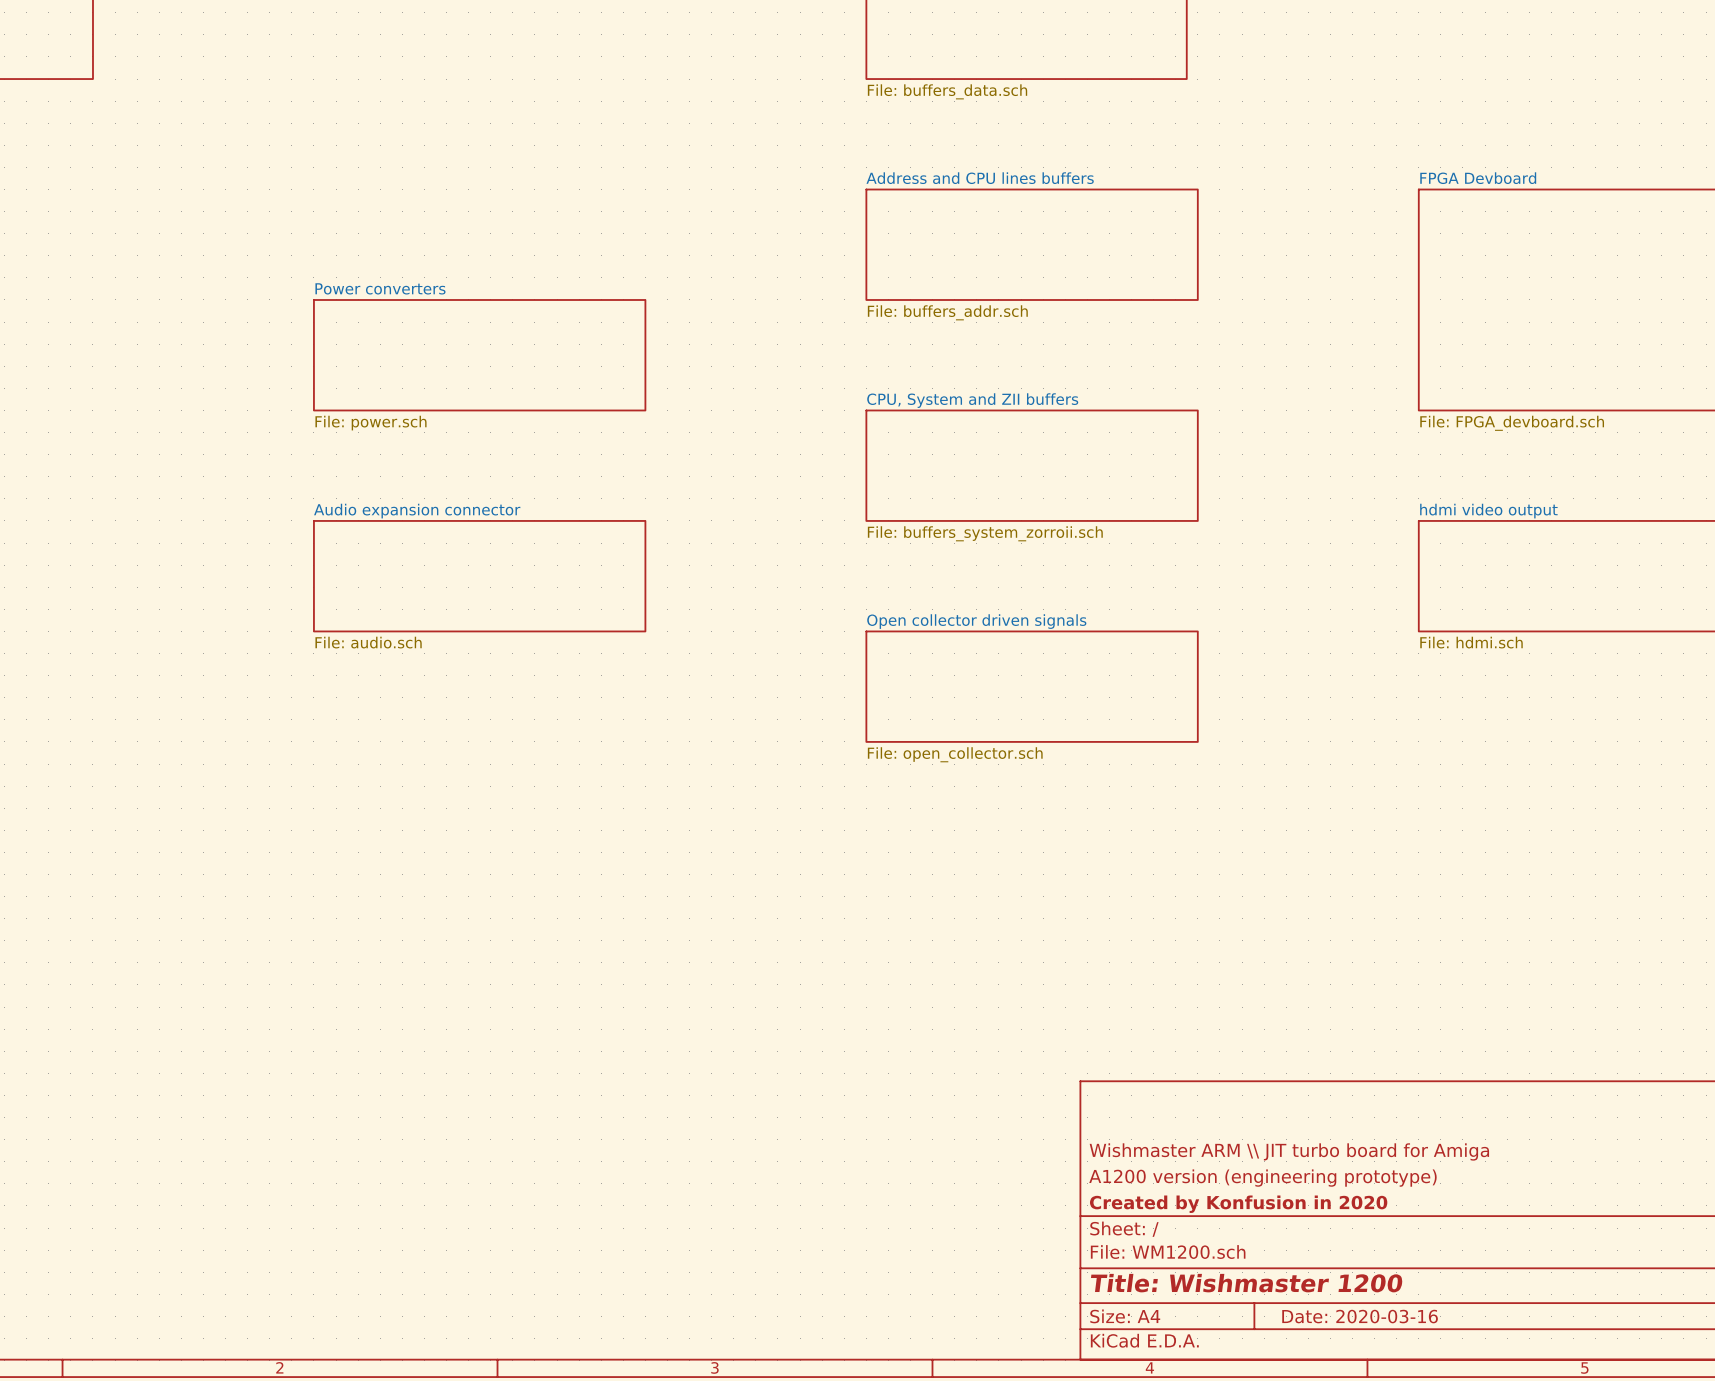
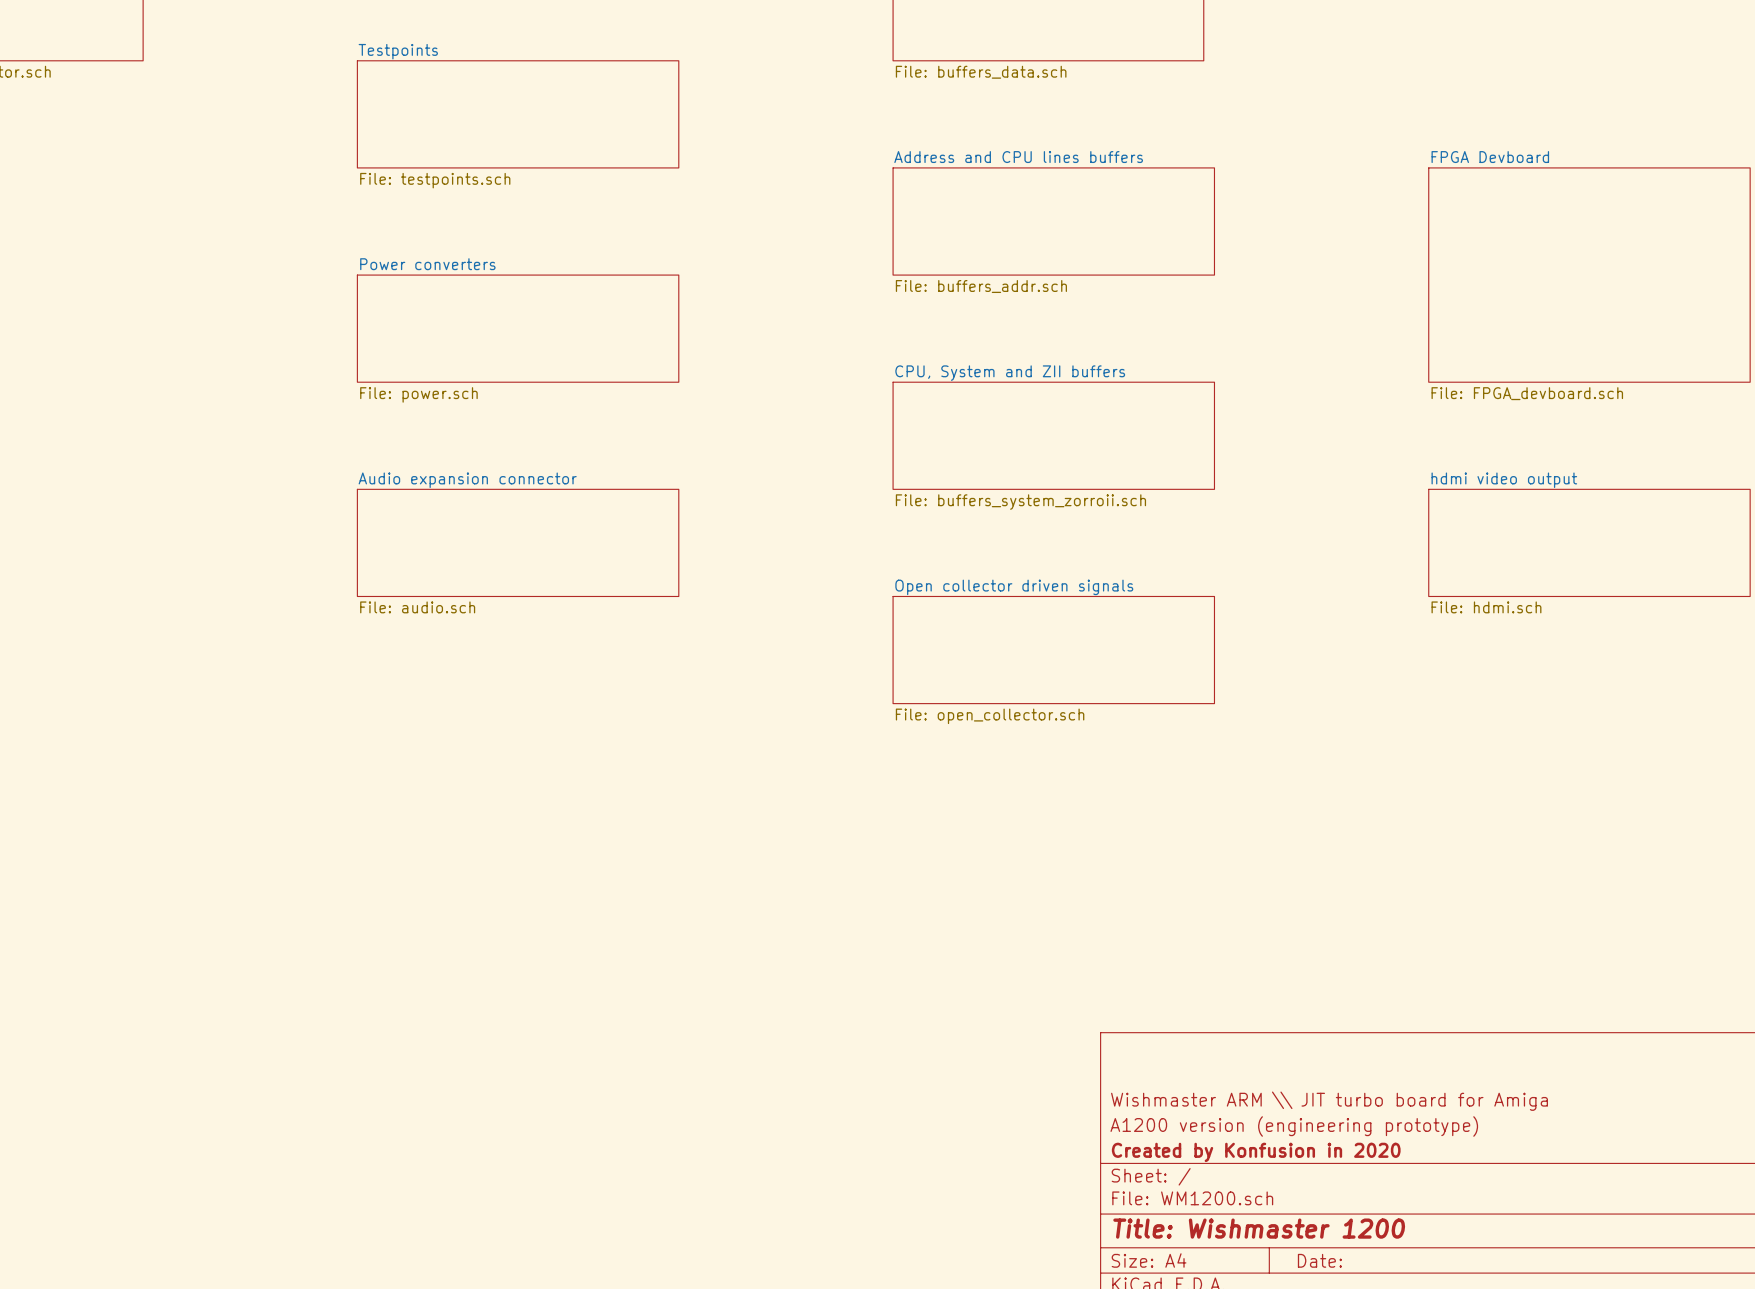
sheet Testpoints: none -> File: testpoints.sch (518, 114)
title block: Date: 2020-03-16 (1360, 1316) -> Date: (1319, 1260)

